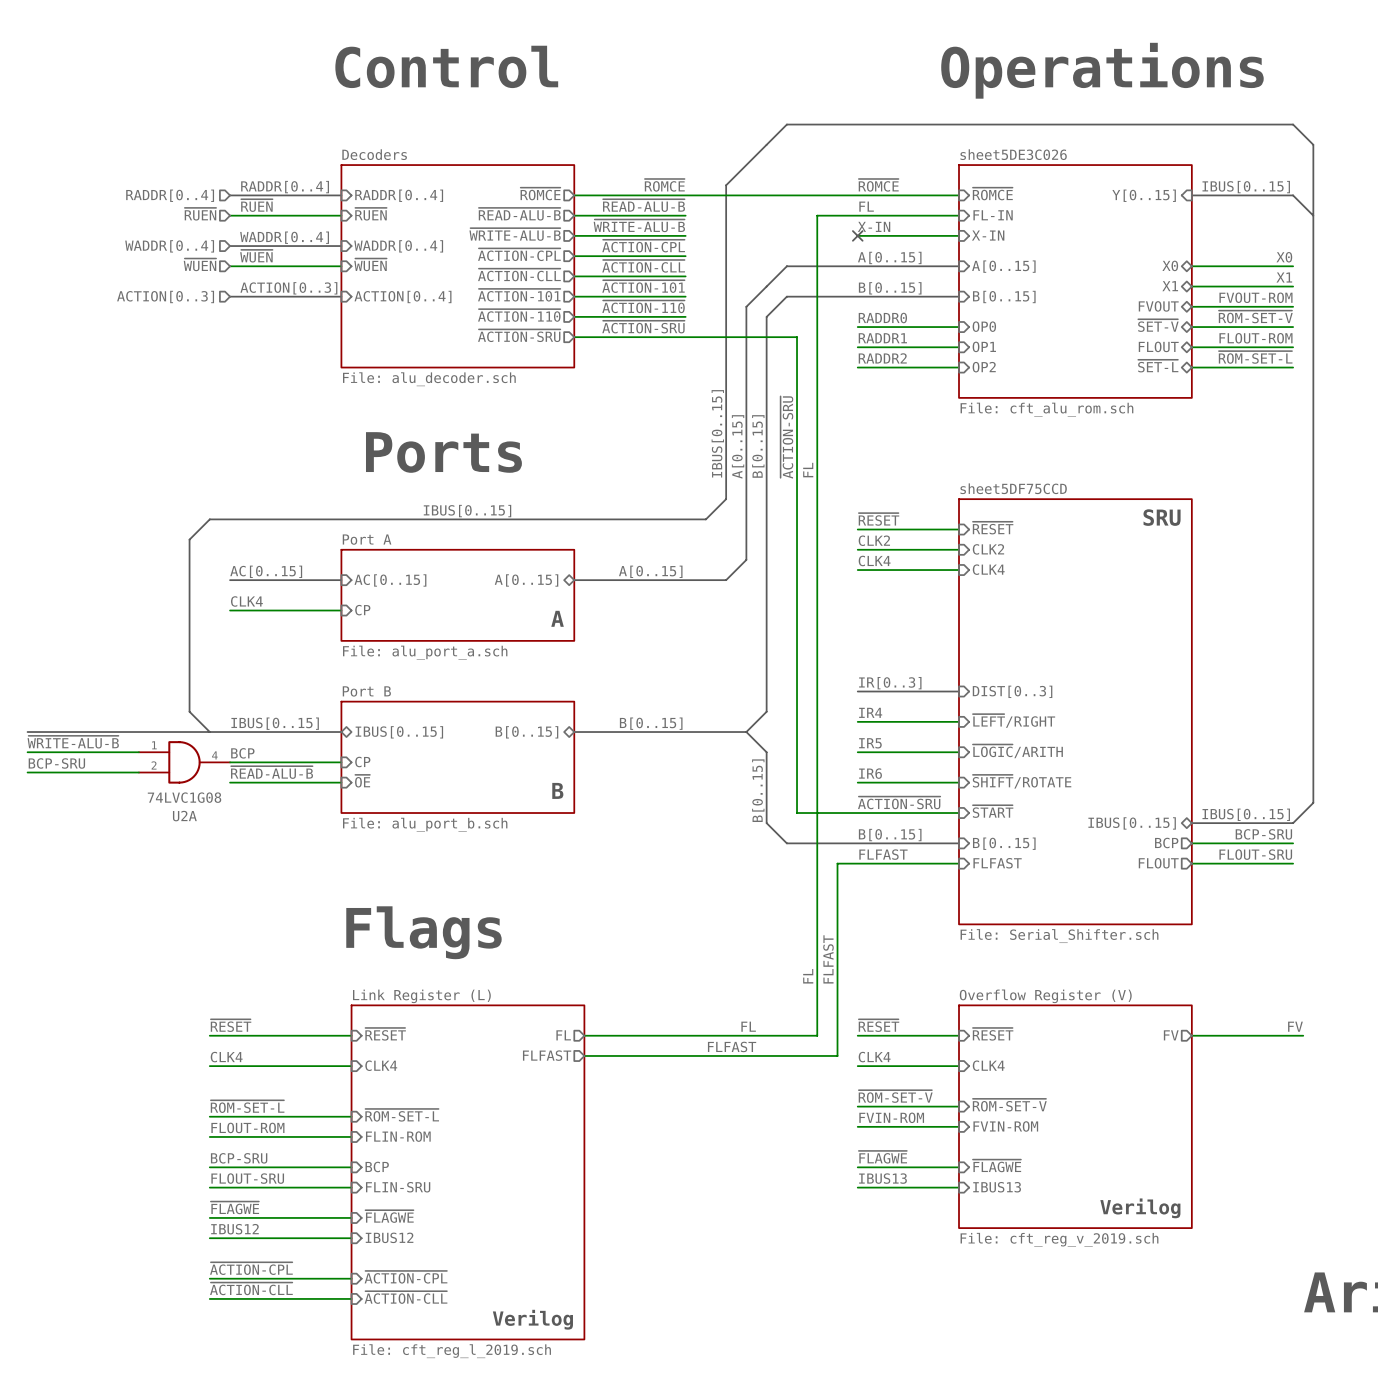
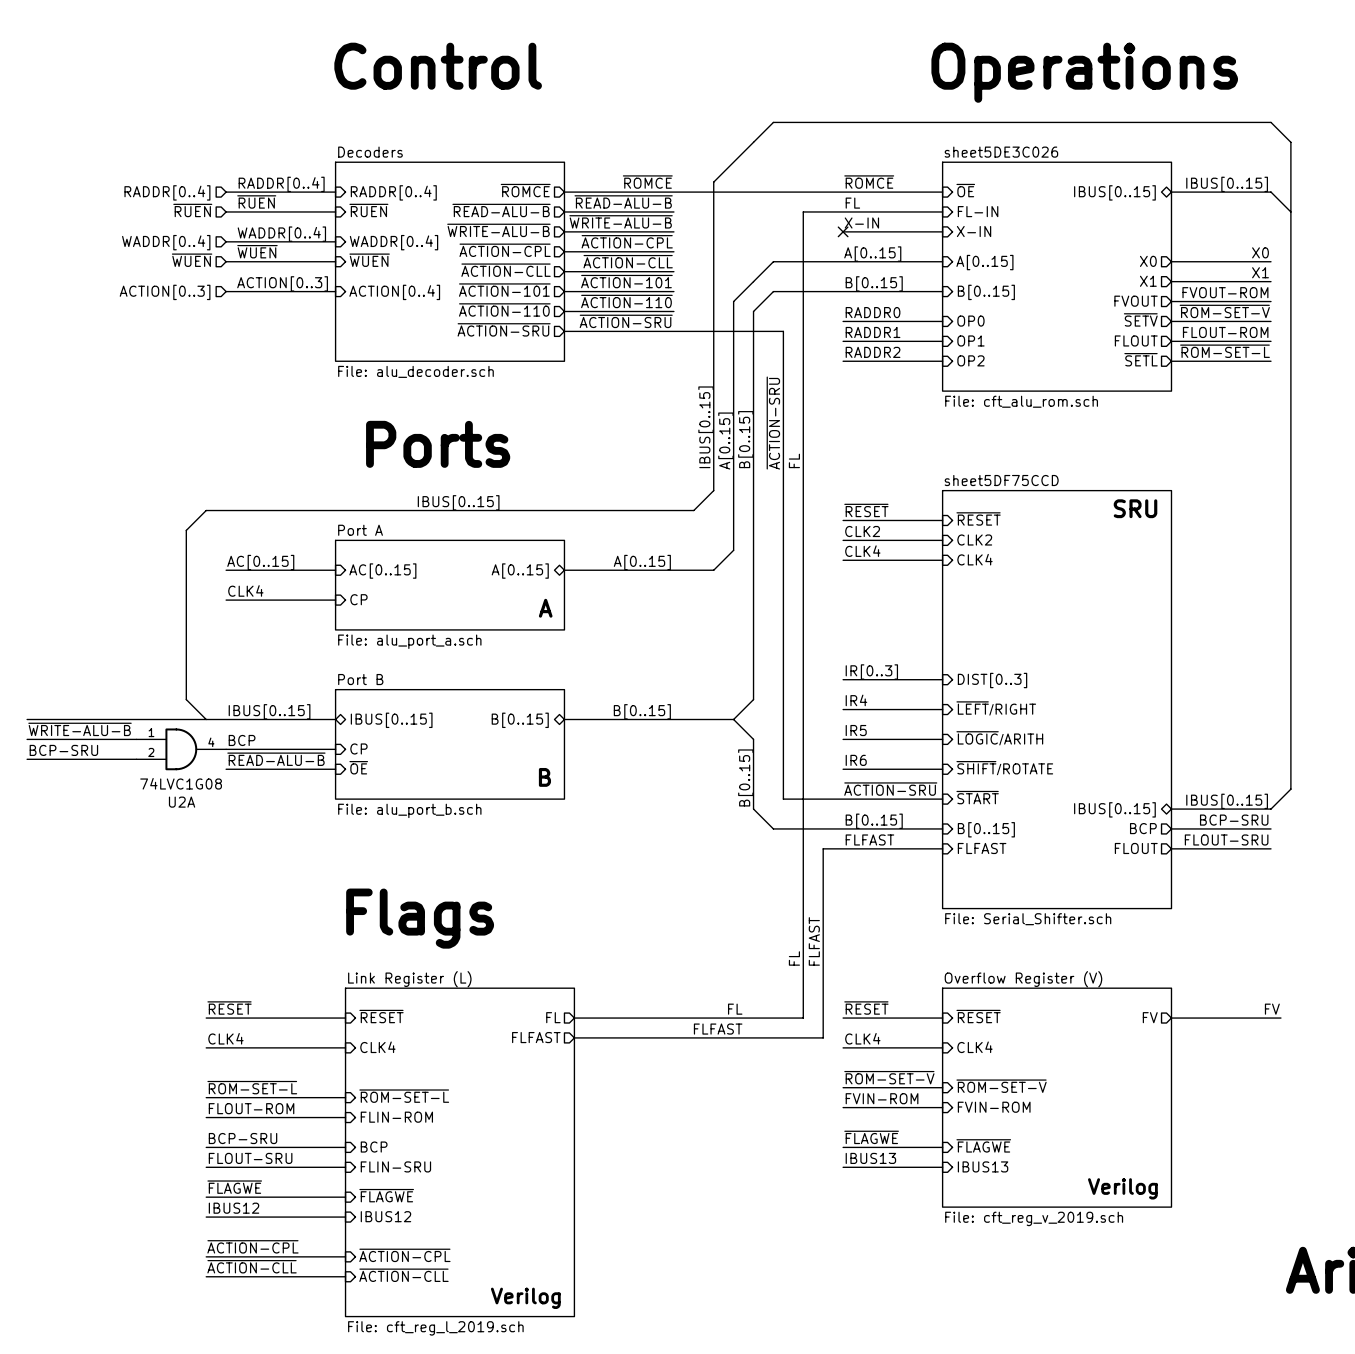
sheet pin: ~{ROMCE} (992, 193) -> ~{OE} (965, 190)
sheet pin shape: input (1144, 195) -> bidirectional (1114, 192)
sheet pin: Y[0..15] (1144, 195) -> IBUS[0..15] (1114, 192)
sheet pin shape: bidirectional (1170, 265) -> output (1148, 261)
sheet pin shape: bidirectional (1170, 286) -> output (1148, 281)
sheet pin shape: bidirectional (1158, 306) -> output (1136, 301)
sheet pin shape: bidirectional (1158, 325) -> output (1140, 319)
sheet pin: ~{SET-V} (1158, 325) -> ~{SETV} (1140, 319)
sheet pin shape: bidirectional (1158, 346) -> output (1136, 340)
sheet pin shape: bidirectional (1158, 366) -> output (1141, 359)
sheet pin: ~{SET-L} (1158, 366) -> ~{SETL} (1141, 359)

